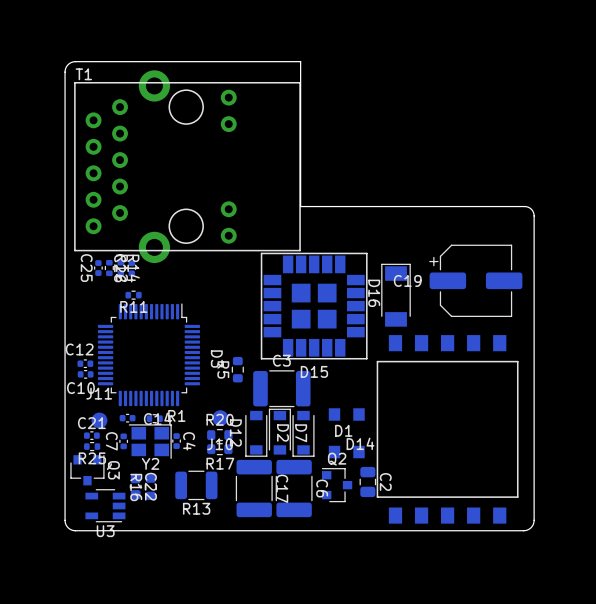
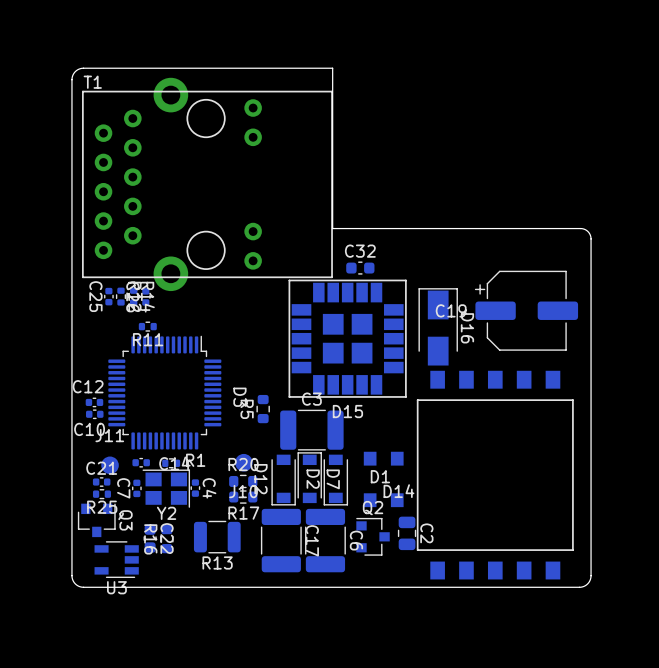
C32: none -> (360, 268)
D16 footprint: [381, 263, 411, 327] -> [418, 288, 458, 366]
D16 name position: D16 (374, 293) -> D16 (467, 328)

